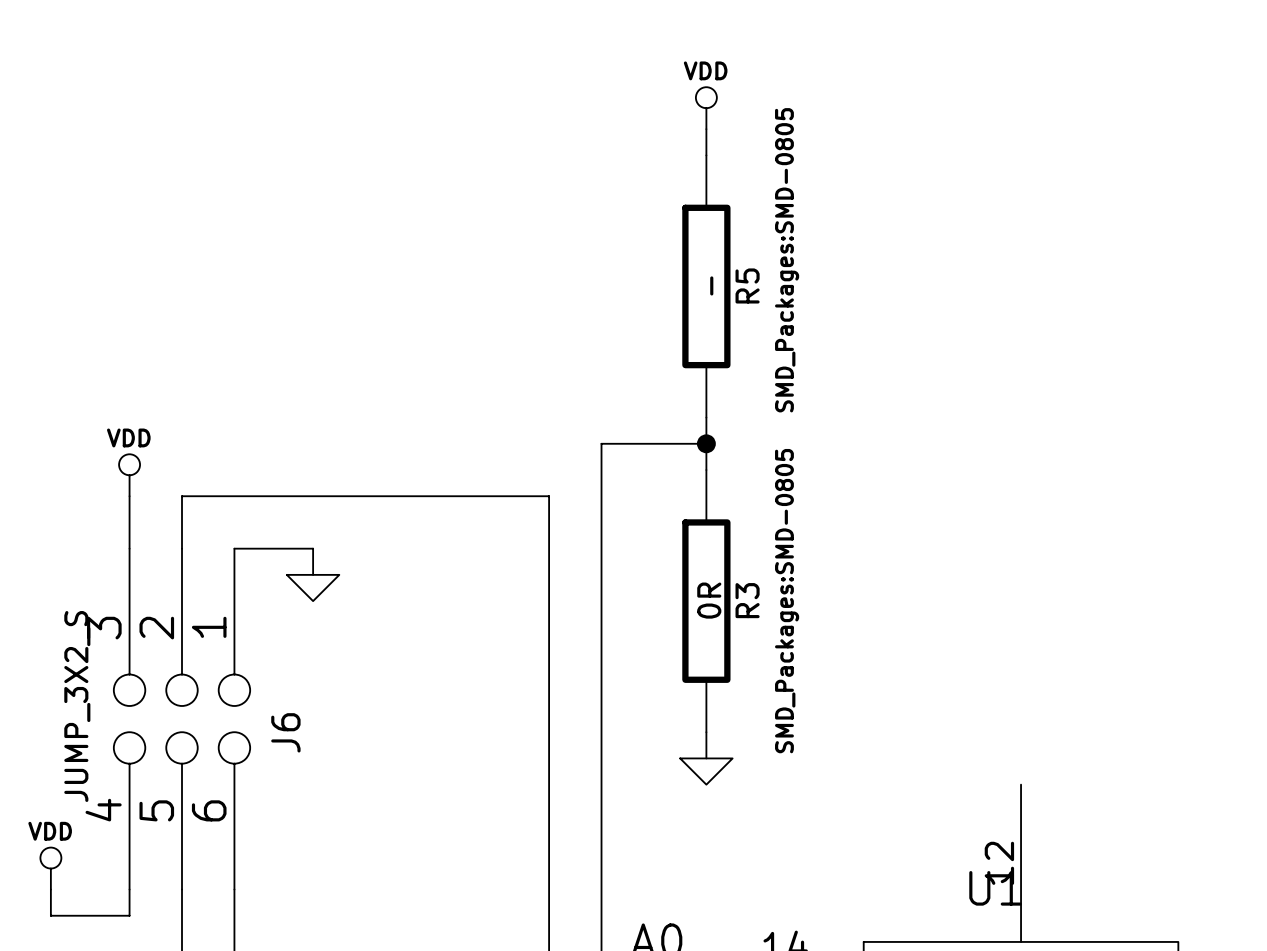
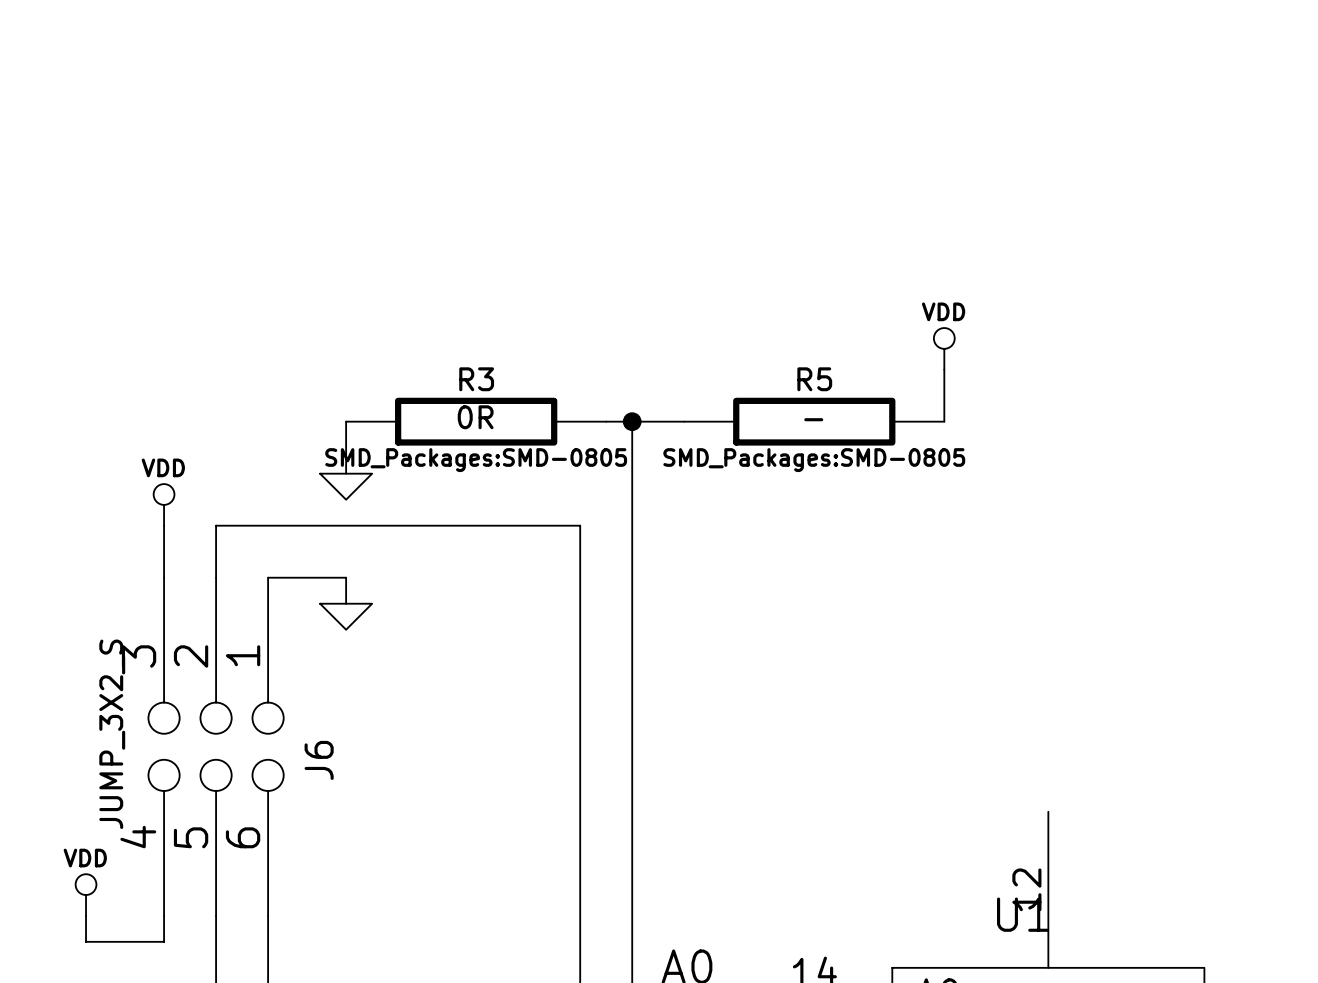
power symbol position: VDD (706, 108) -> VDD (944, 348)
wire: (706, 129) (706, 155) -> none
R5 text position: SMD_Packages:SMD-0805 (787, 260) -> SMD_Packages:SMD-0805 (814, 460)
R5 name position: R5 (747, 285) -> R5 (814, 379)
R5 rotation: 0° (706, 286) -> 90° clockwise (814, 421)
wire: none -> (346, 421) (346, 473)
wire: none -> (606, 421) (684, 421)
wire: (706, 417) (706, 470) -> (944, 369) (944, 421)
wire: (601, 443) (706, 443) -> (632, 473) (632, 421)
junction position: (706, 443) -> (632, 421)
R3 name position: R3 (747, 600) -> R3 (476, 379)
R3 rotation: 0° (706, 601) -> 90° clockwise (476, 421)
R3 position: (706, 601) -> (476, 421)
R3 text position: SMD_Packages:SMD-0805 (787, 601) -> SMD_Packages:SMD-0805 (476, 460)
wire: (706, 732) (706, 758) -> none
power symbol position: (706, 771) -> (346, 486)

